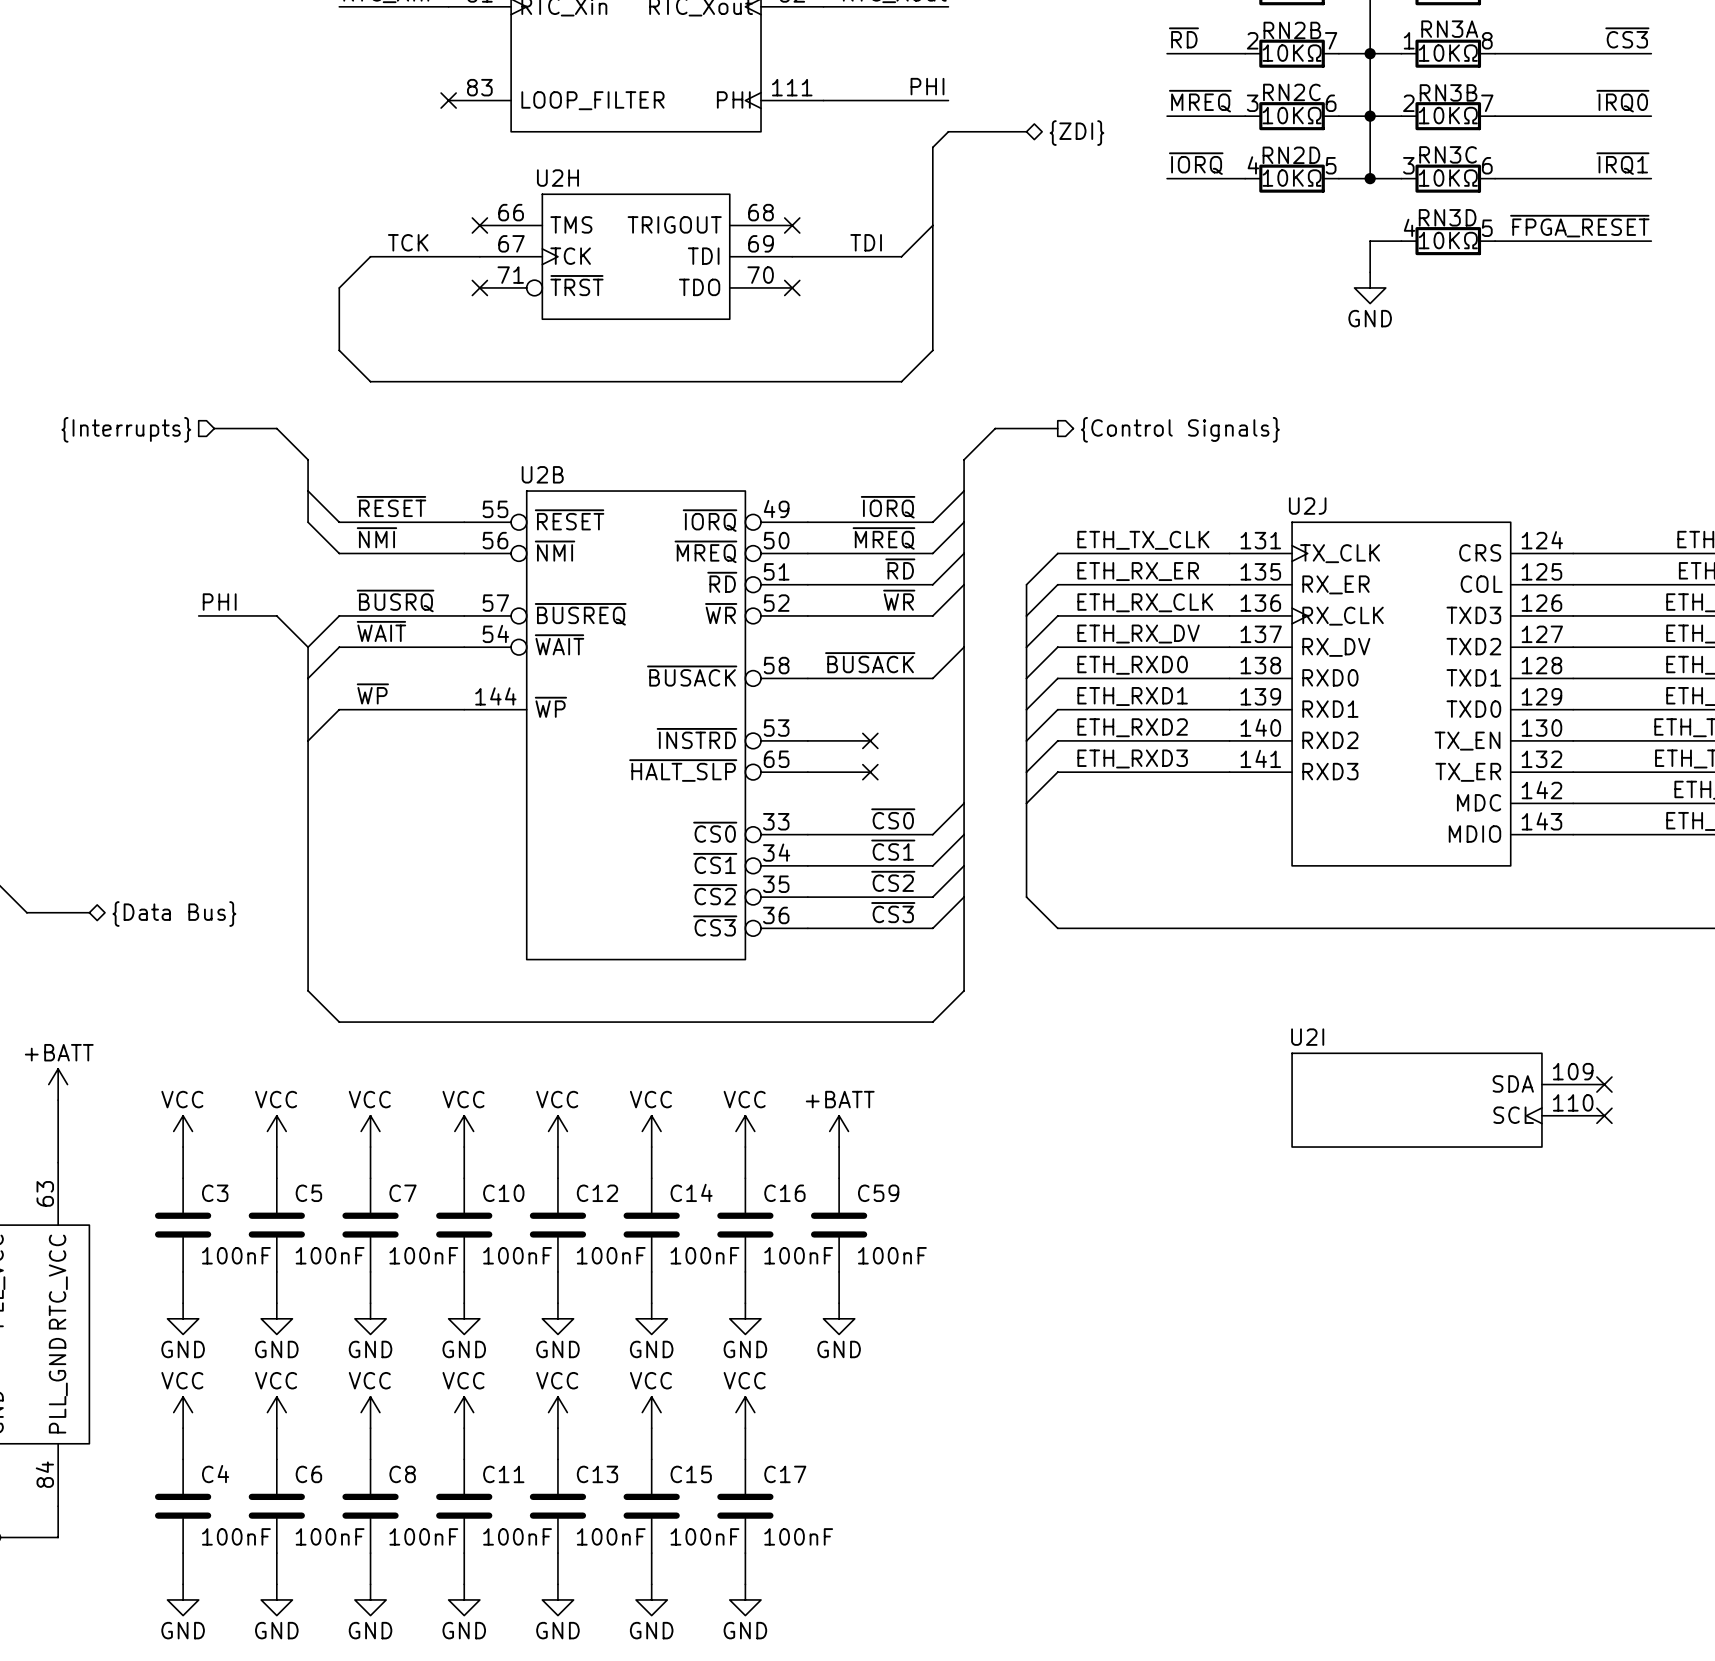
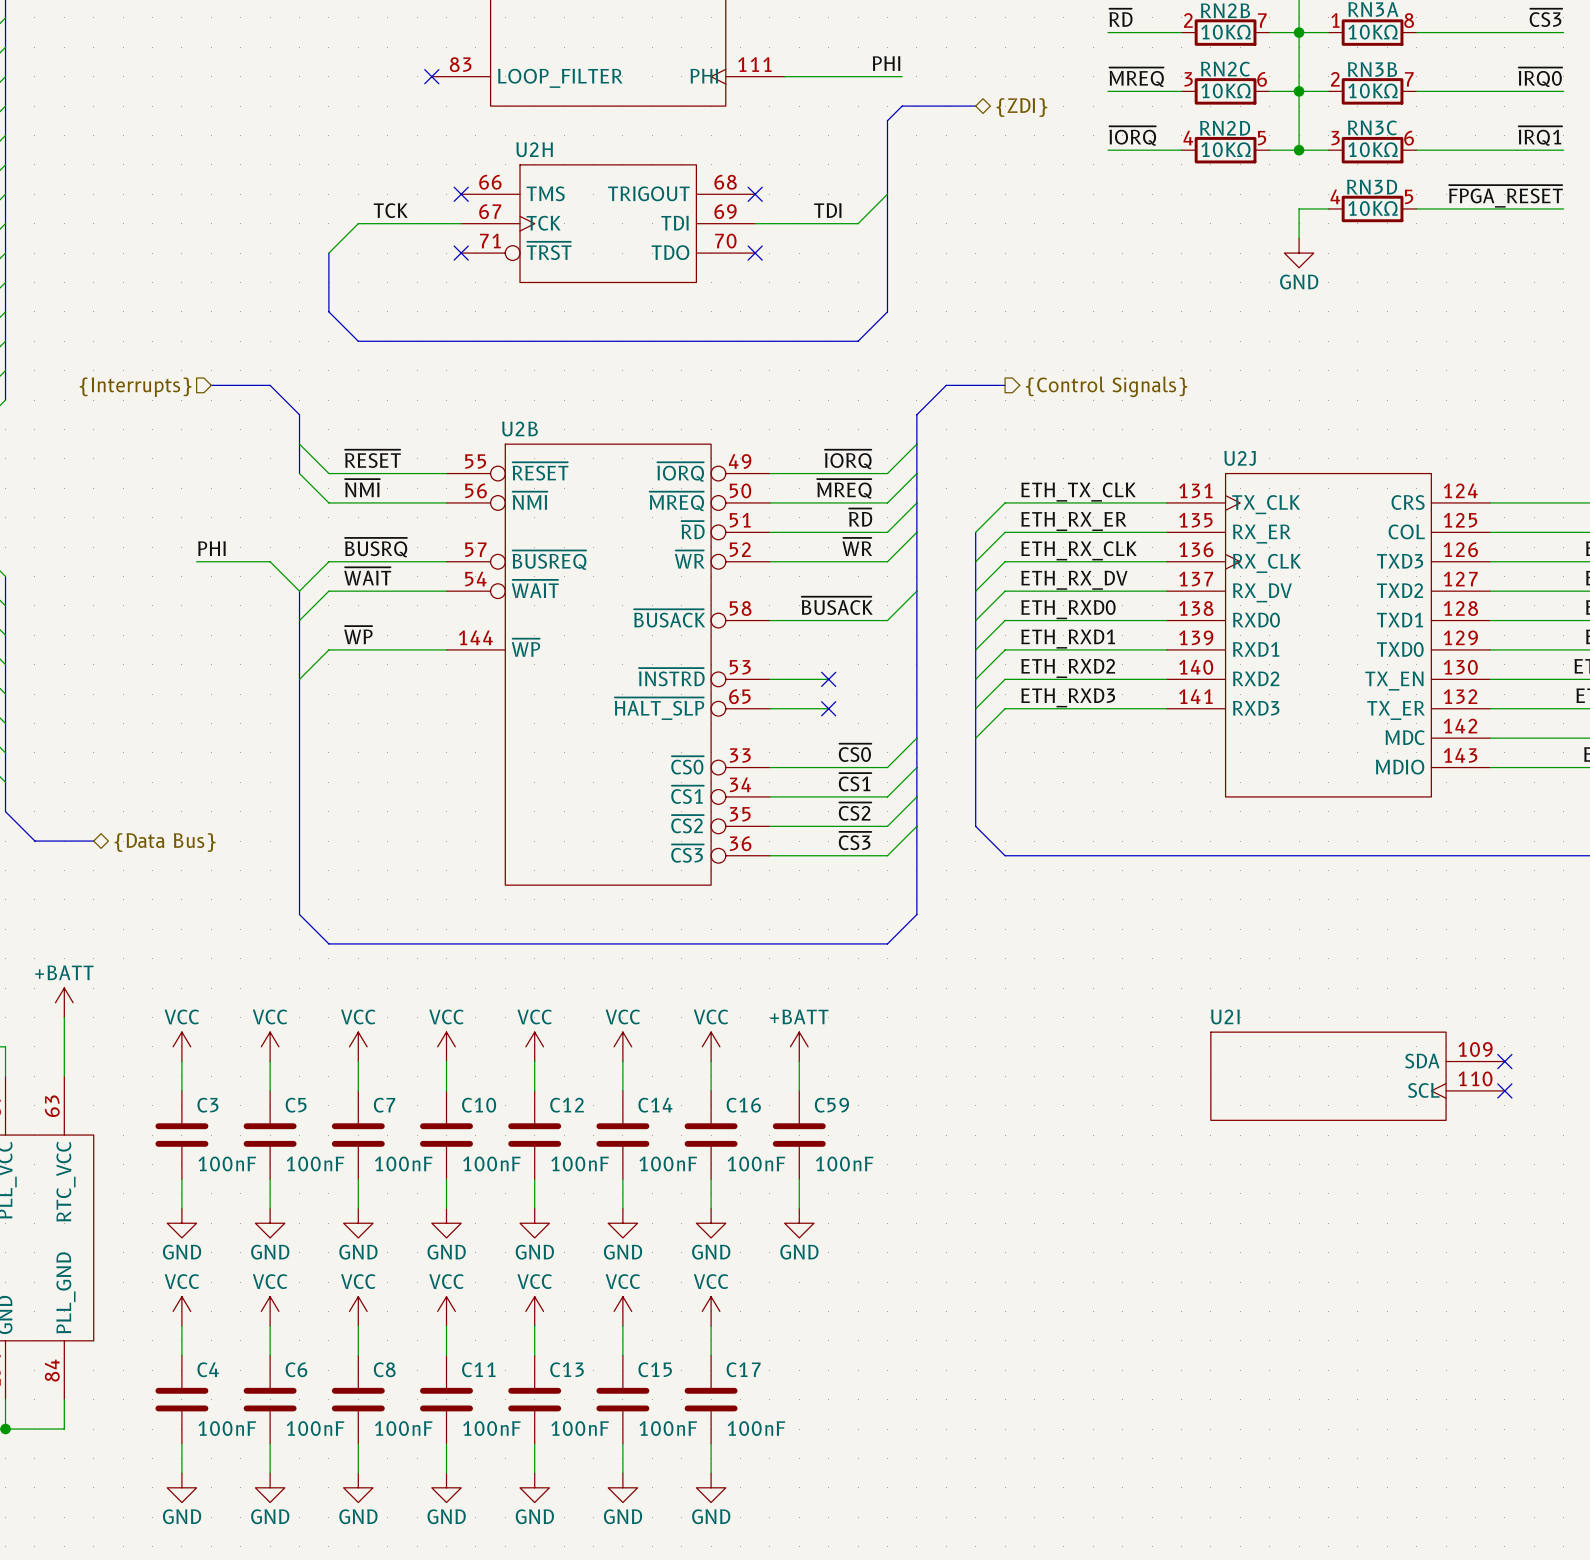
no-connect mark: (1604, 1084) -> none
U2I position: (1448, 1100) -> (1357, 1076)
no-connect mark: (1604, 1115) -> none
no-connect mark: none -> (1504, 1061)
no-connect mark: none -> (1504, 1090)

